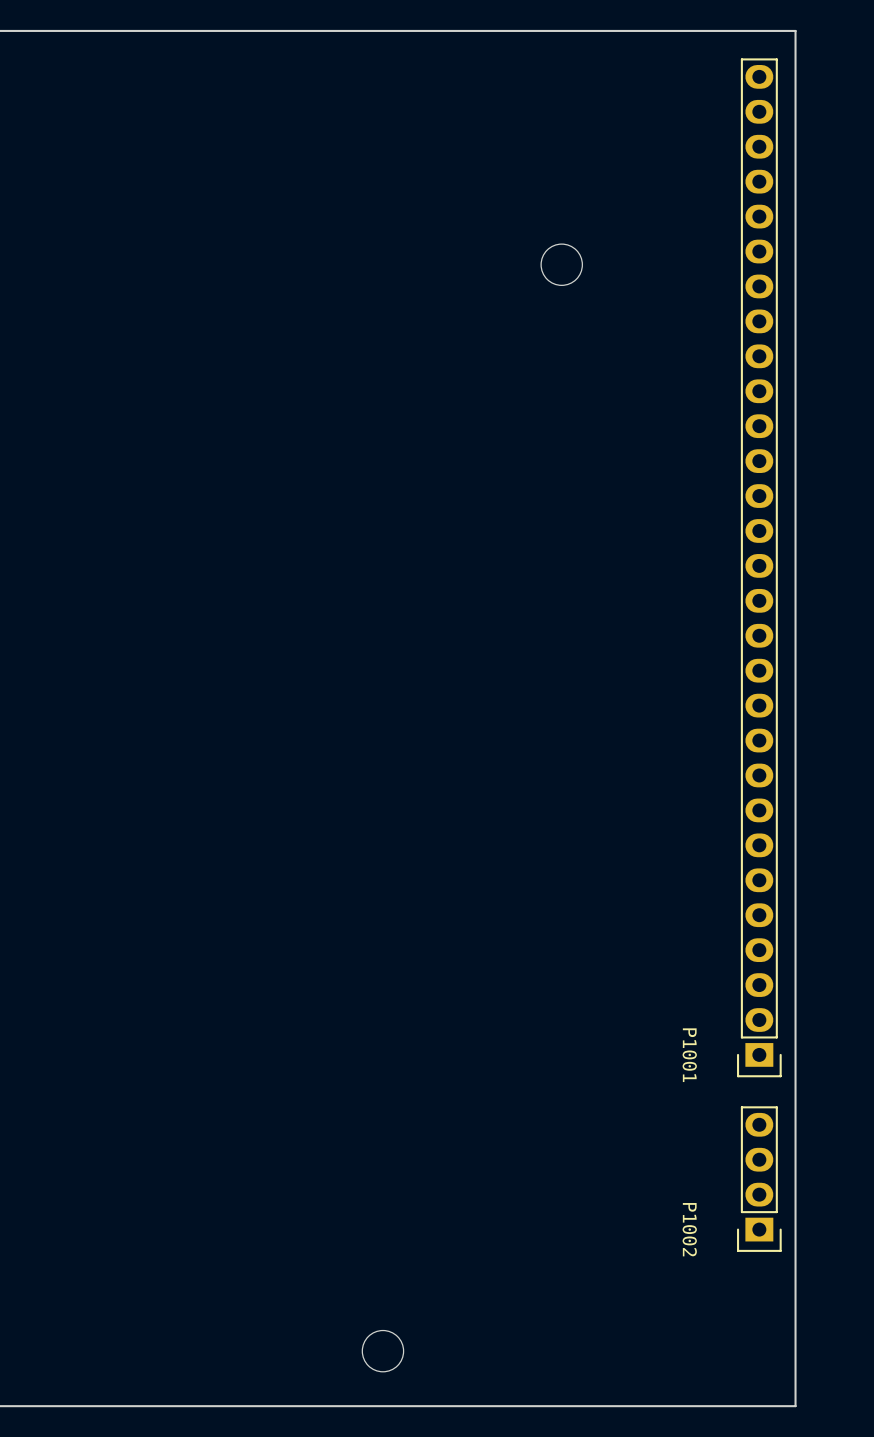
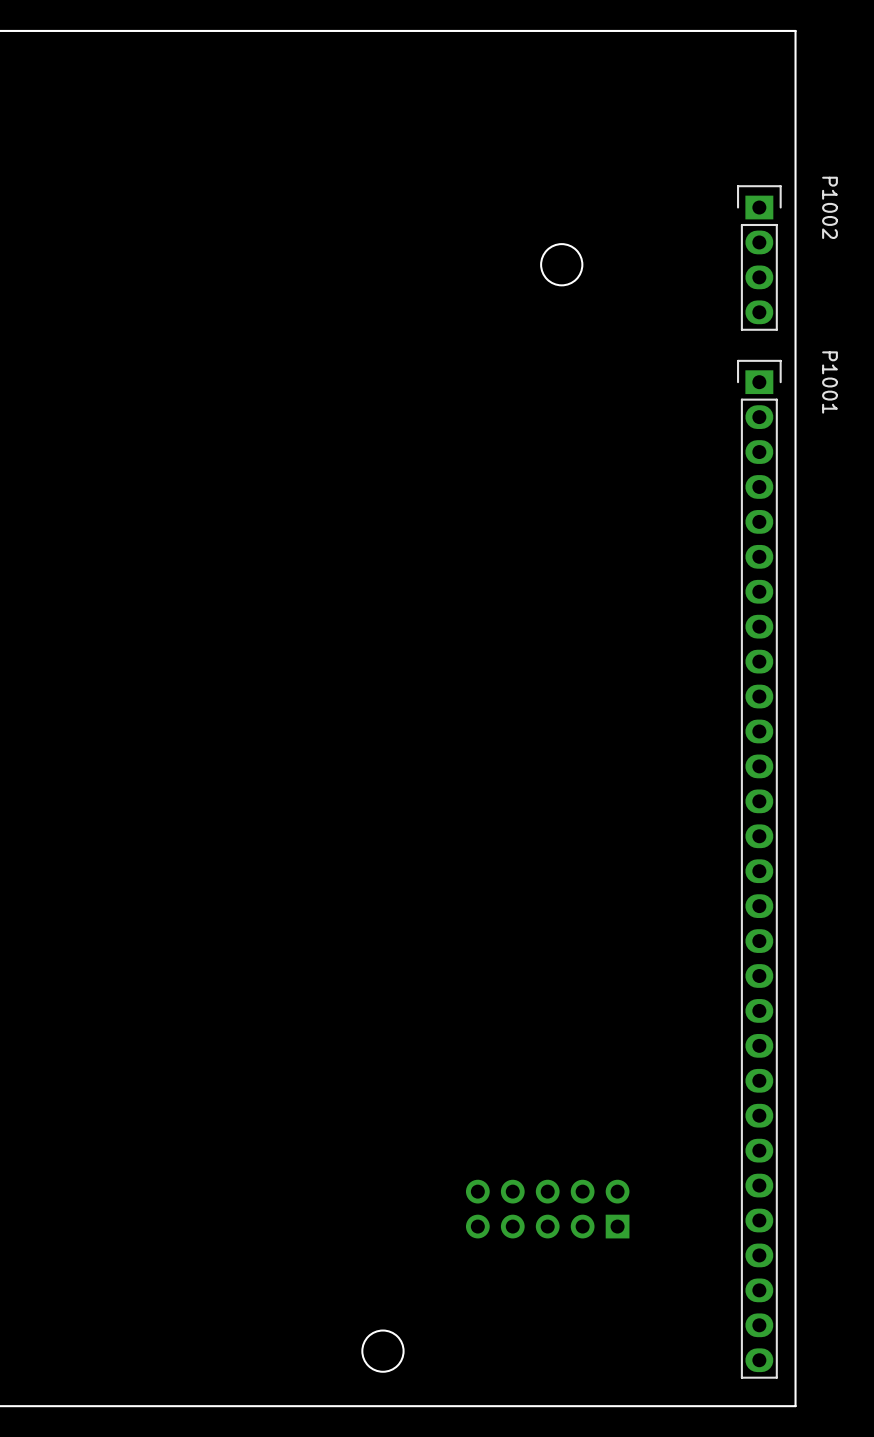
P1001 rotation: 0° (759, 567) -> 180° (759, 869)
P1002 rotation: 0° (759, 1179) -> 180° (759, 257)
P1002 position: (759, 1179) -> (759, 257)
part: none -> (547, 1209)

